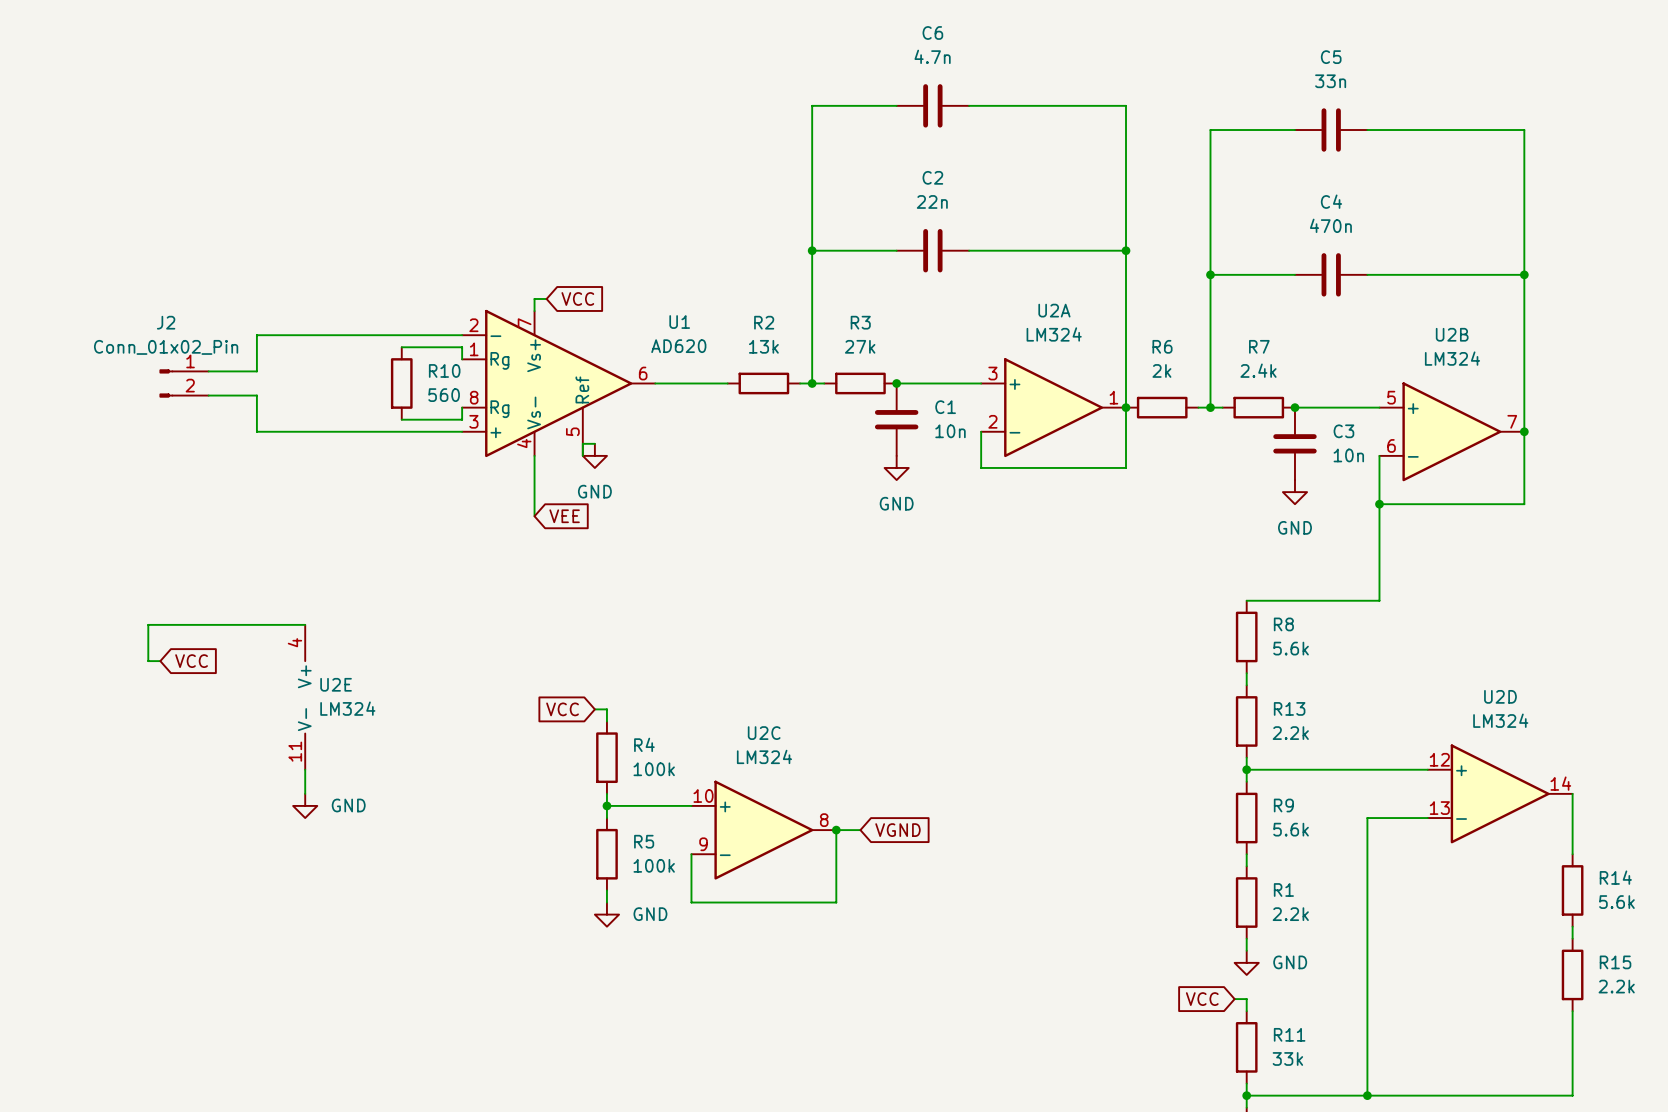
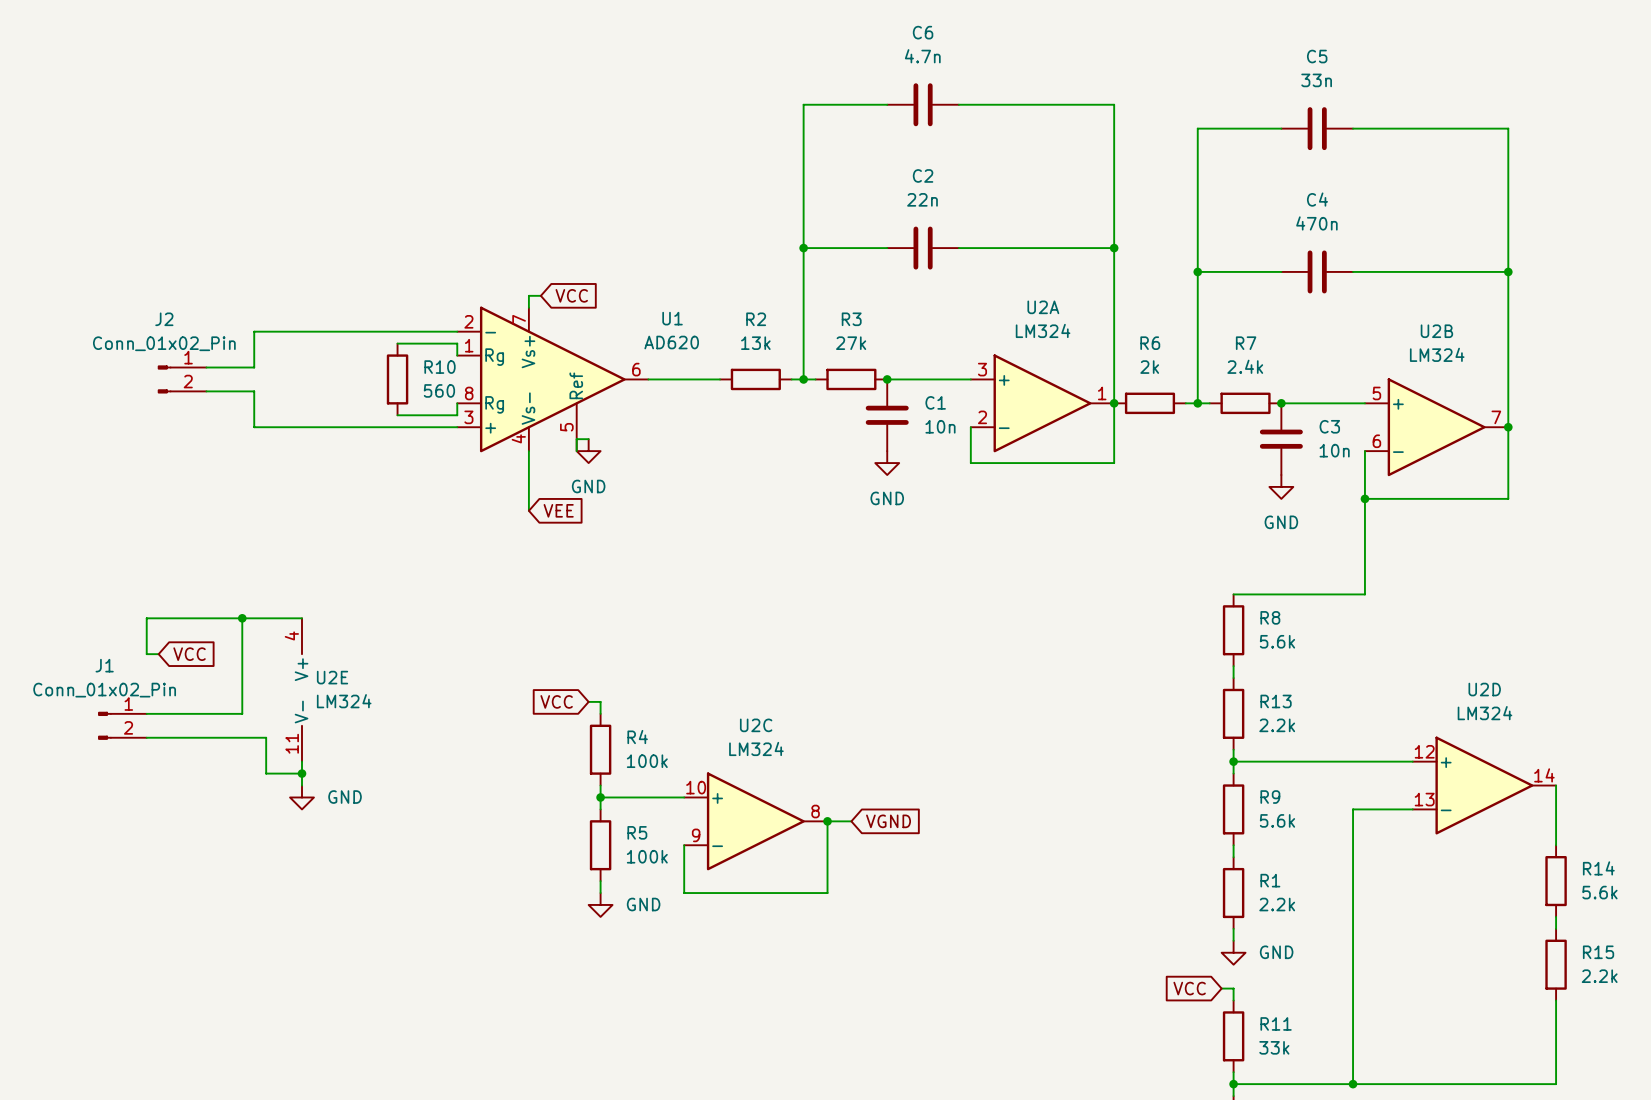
wire: none -> (242, 618) (242, 713) (146, 713)
junction: none -> (242, 618)
J1: none -> Conn_01x02_Pin (122, 725)
wire: none -> (146, 737) (266, 737) (266, 773) (302, 773)
junction: none -> (302, 773)

